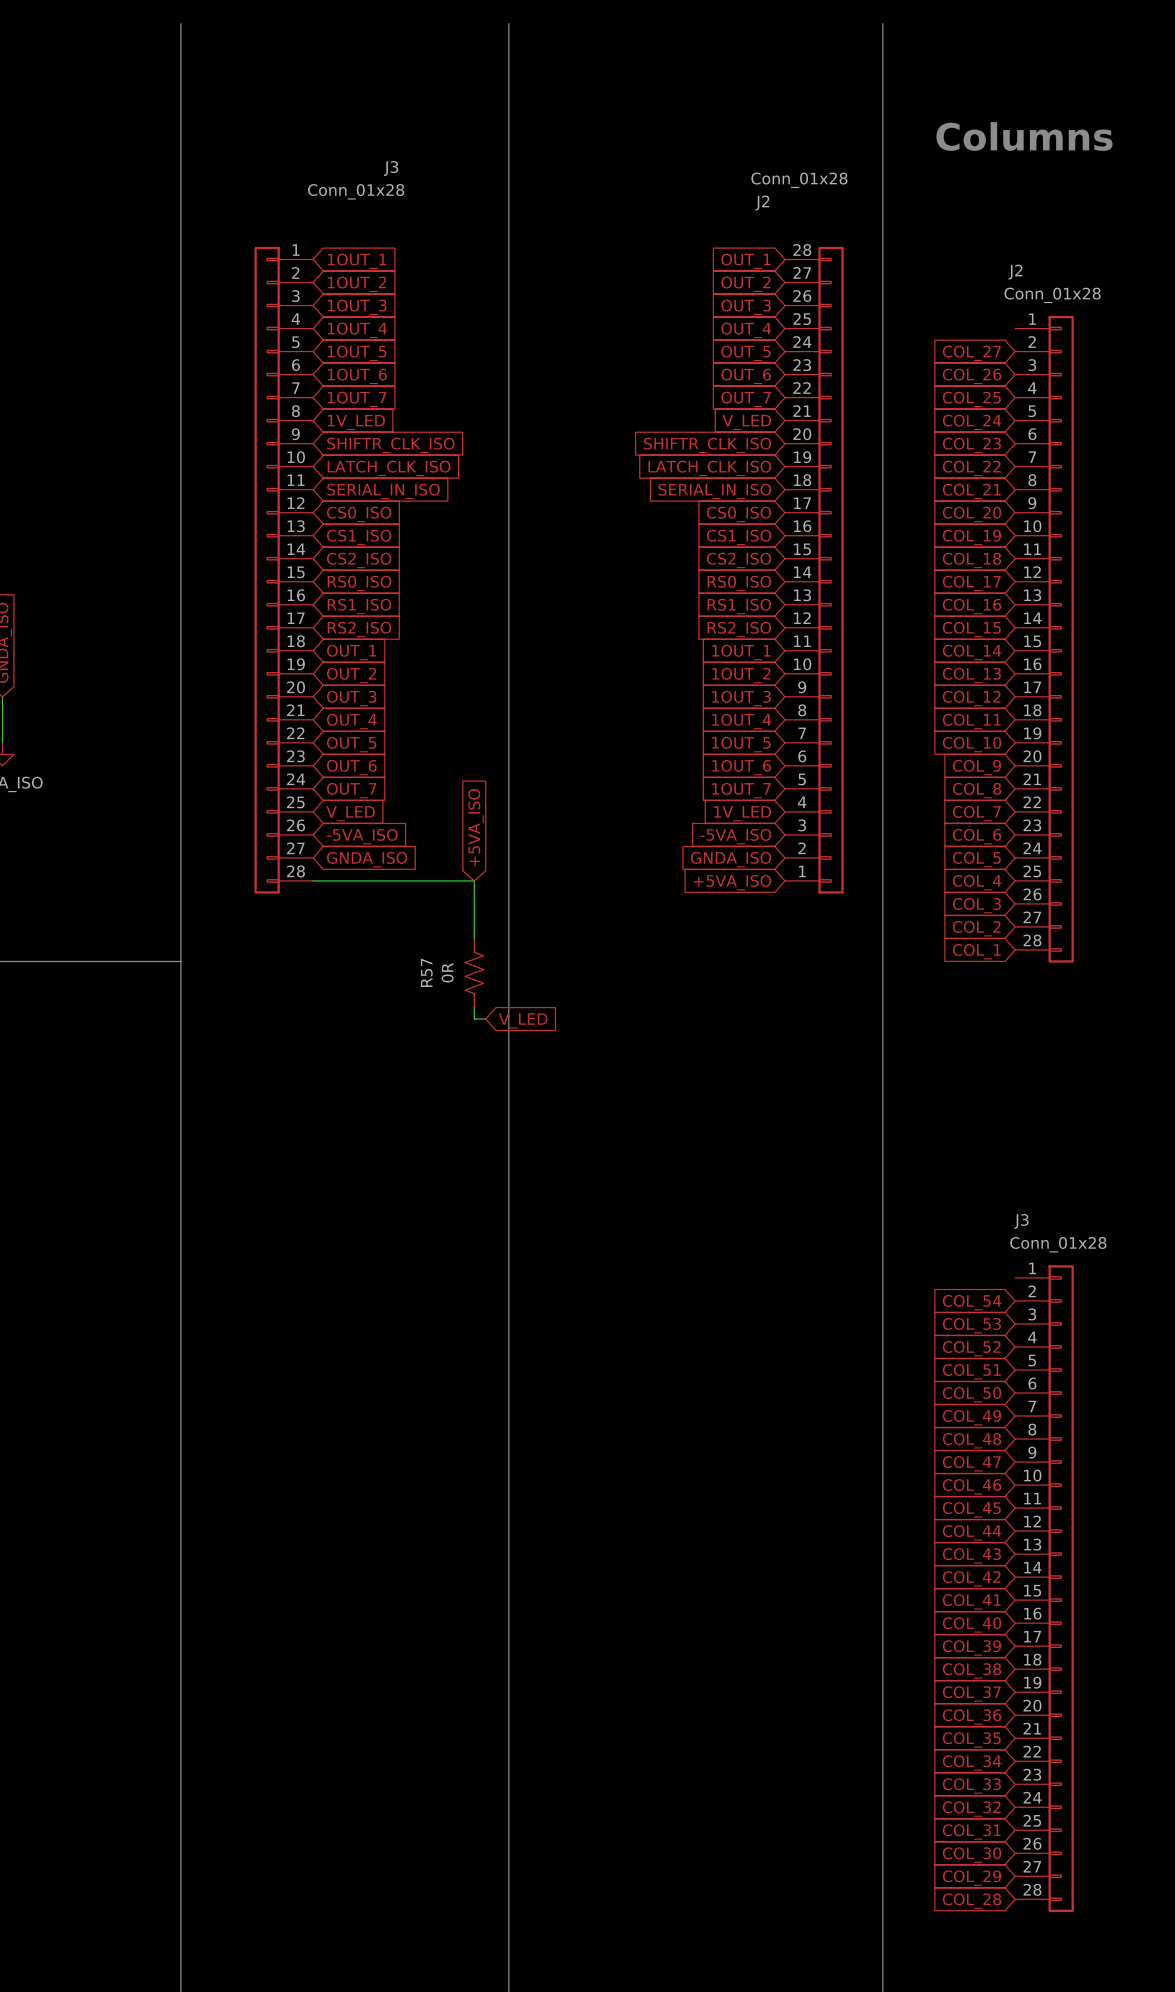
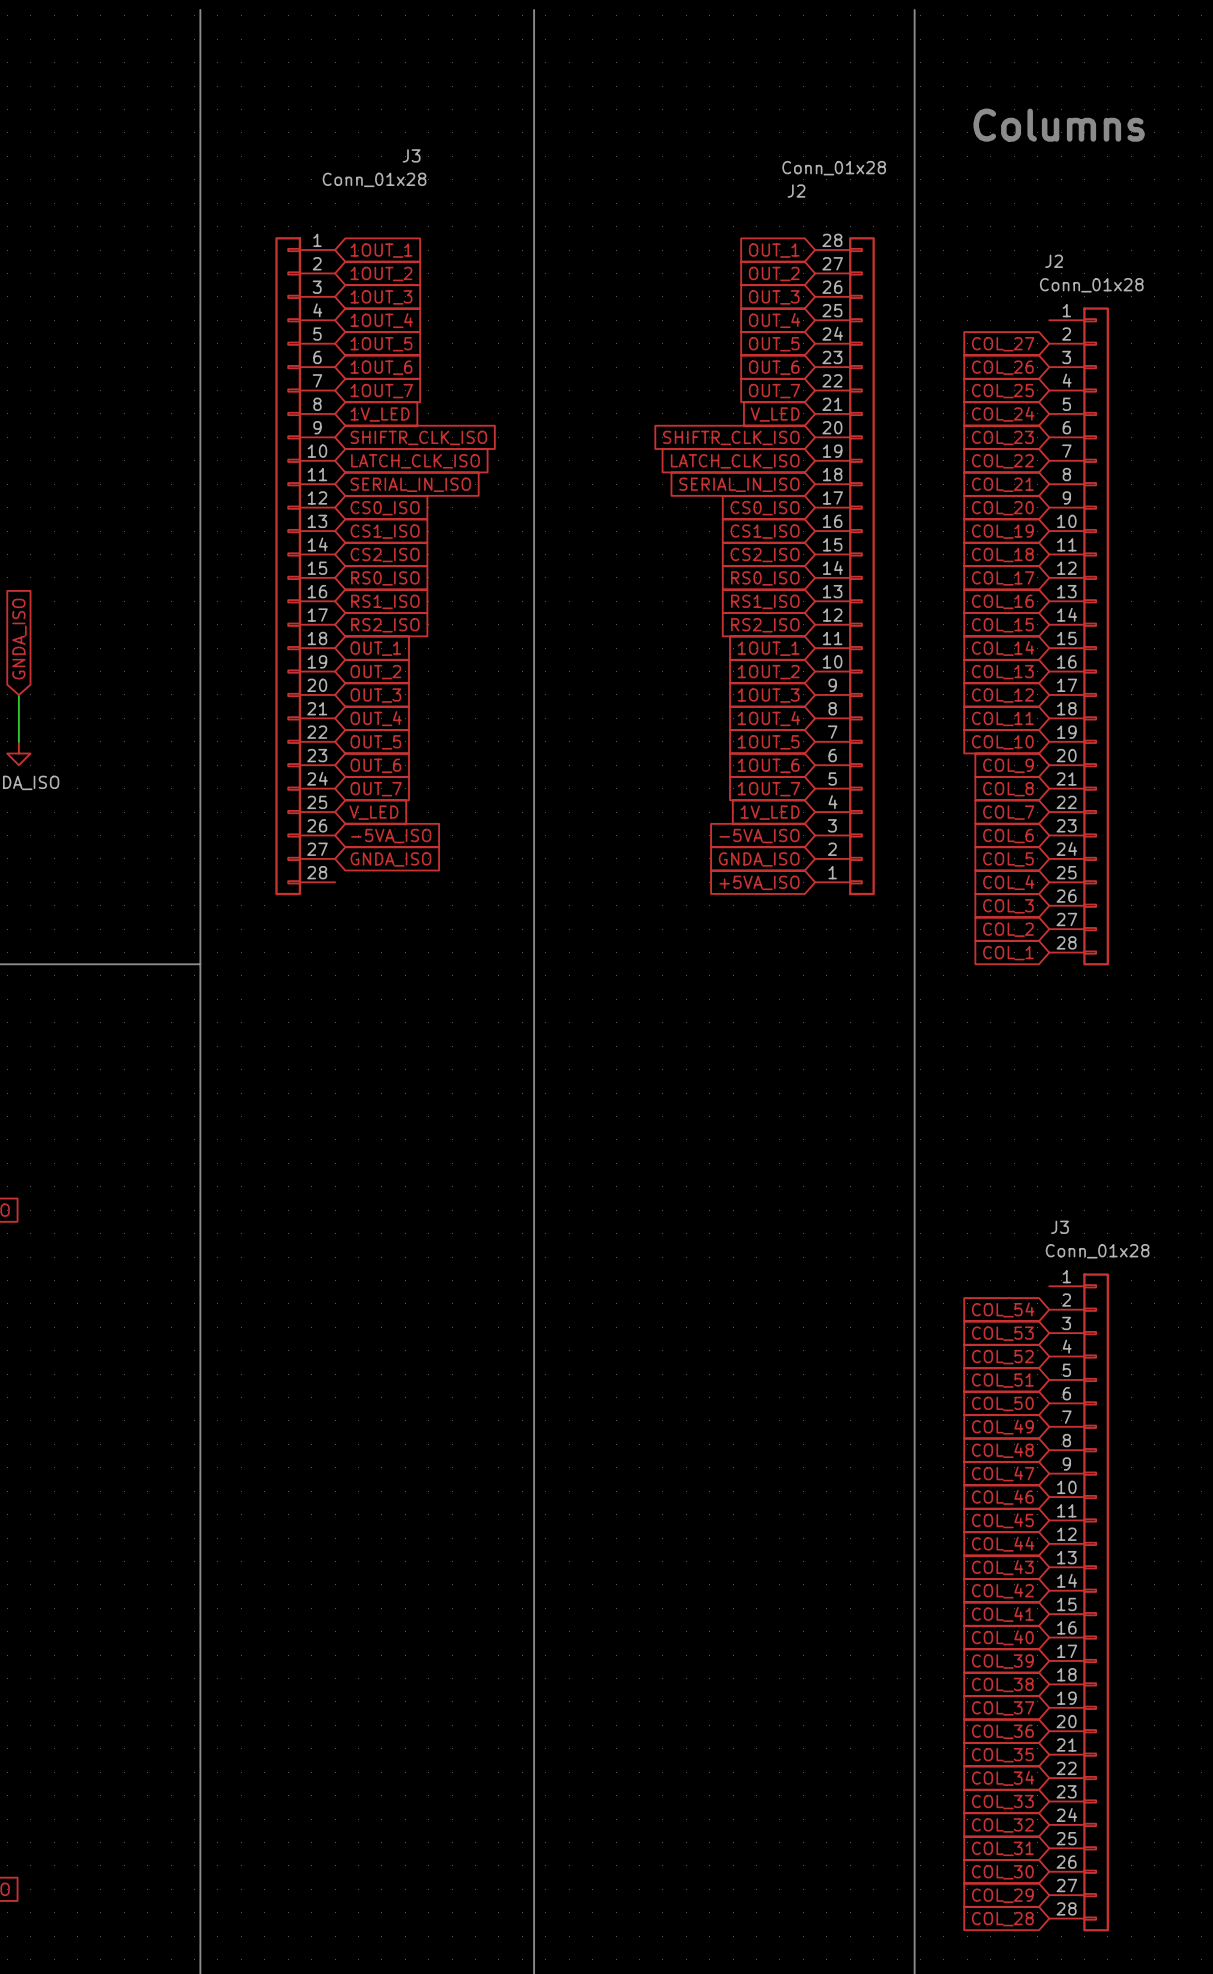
global label: +5VA_ISO (476, 827) -> none
wire: (313, 880) (474, 880) (474, 938) -> none
R57: 0R (474, 972) -> none
wire: (474, 1007) (474, 1019) (485, 1019) -> none
global label: V_LED (523, 1020) -> none

